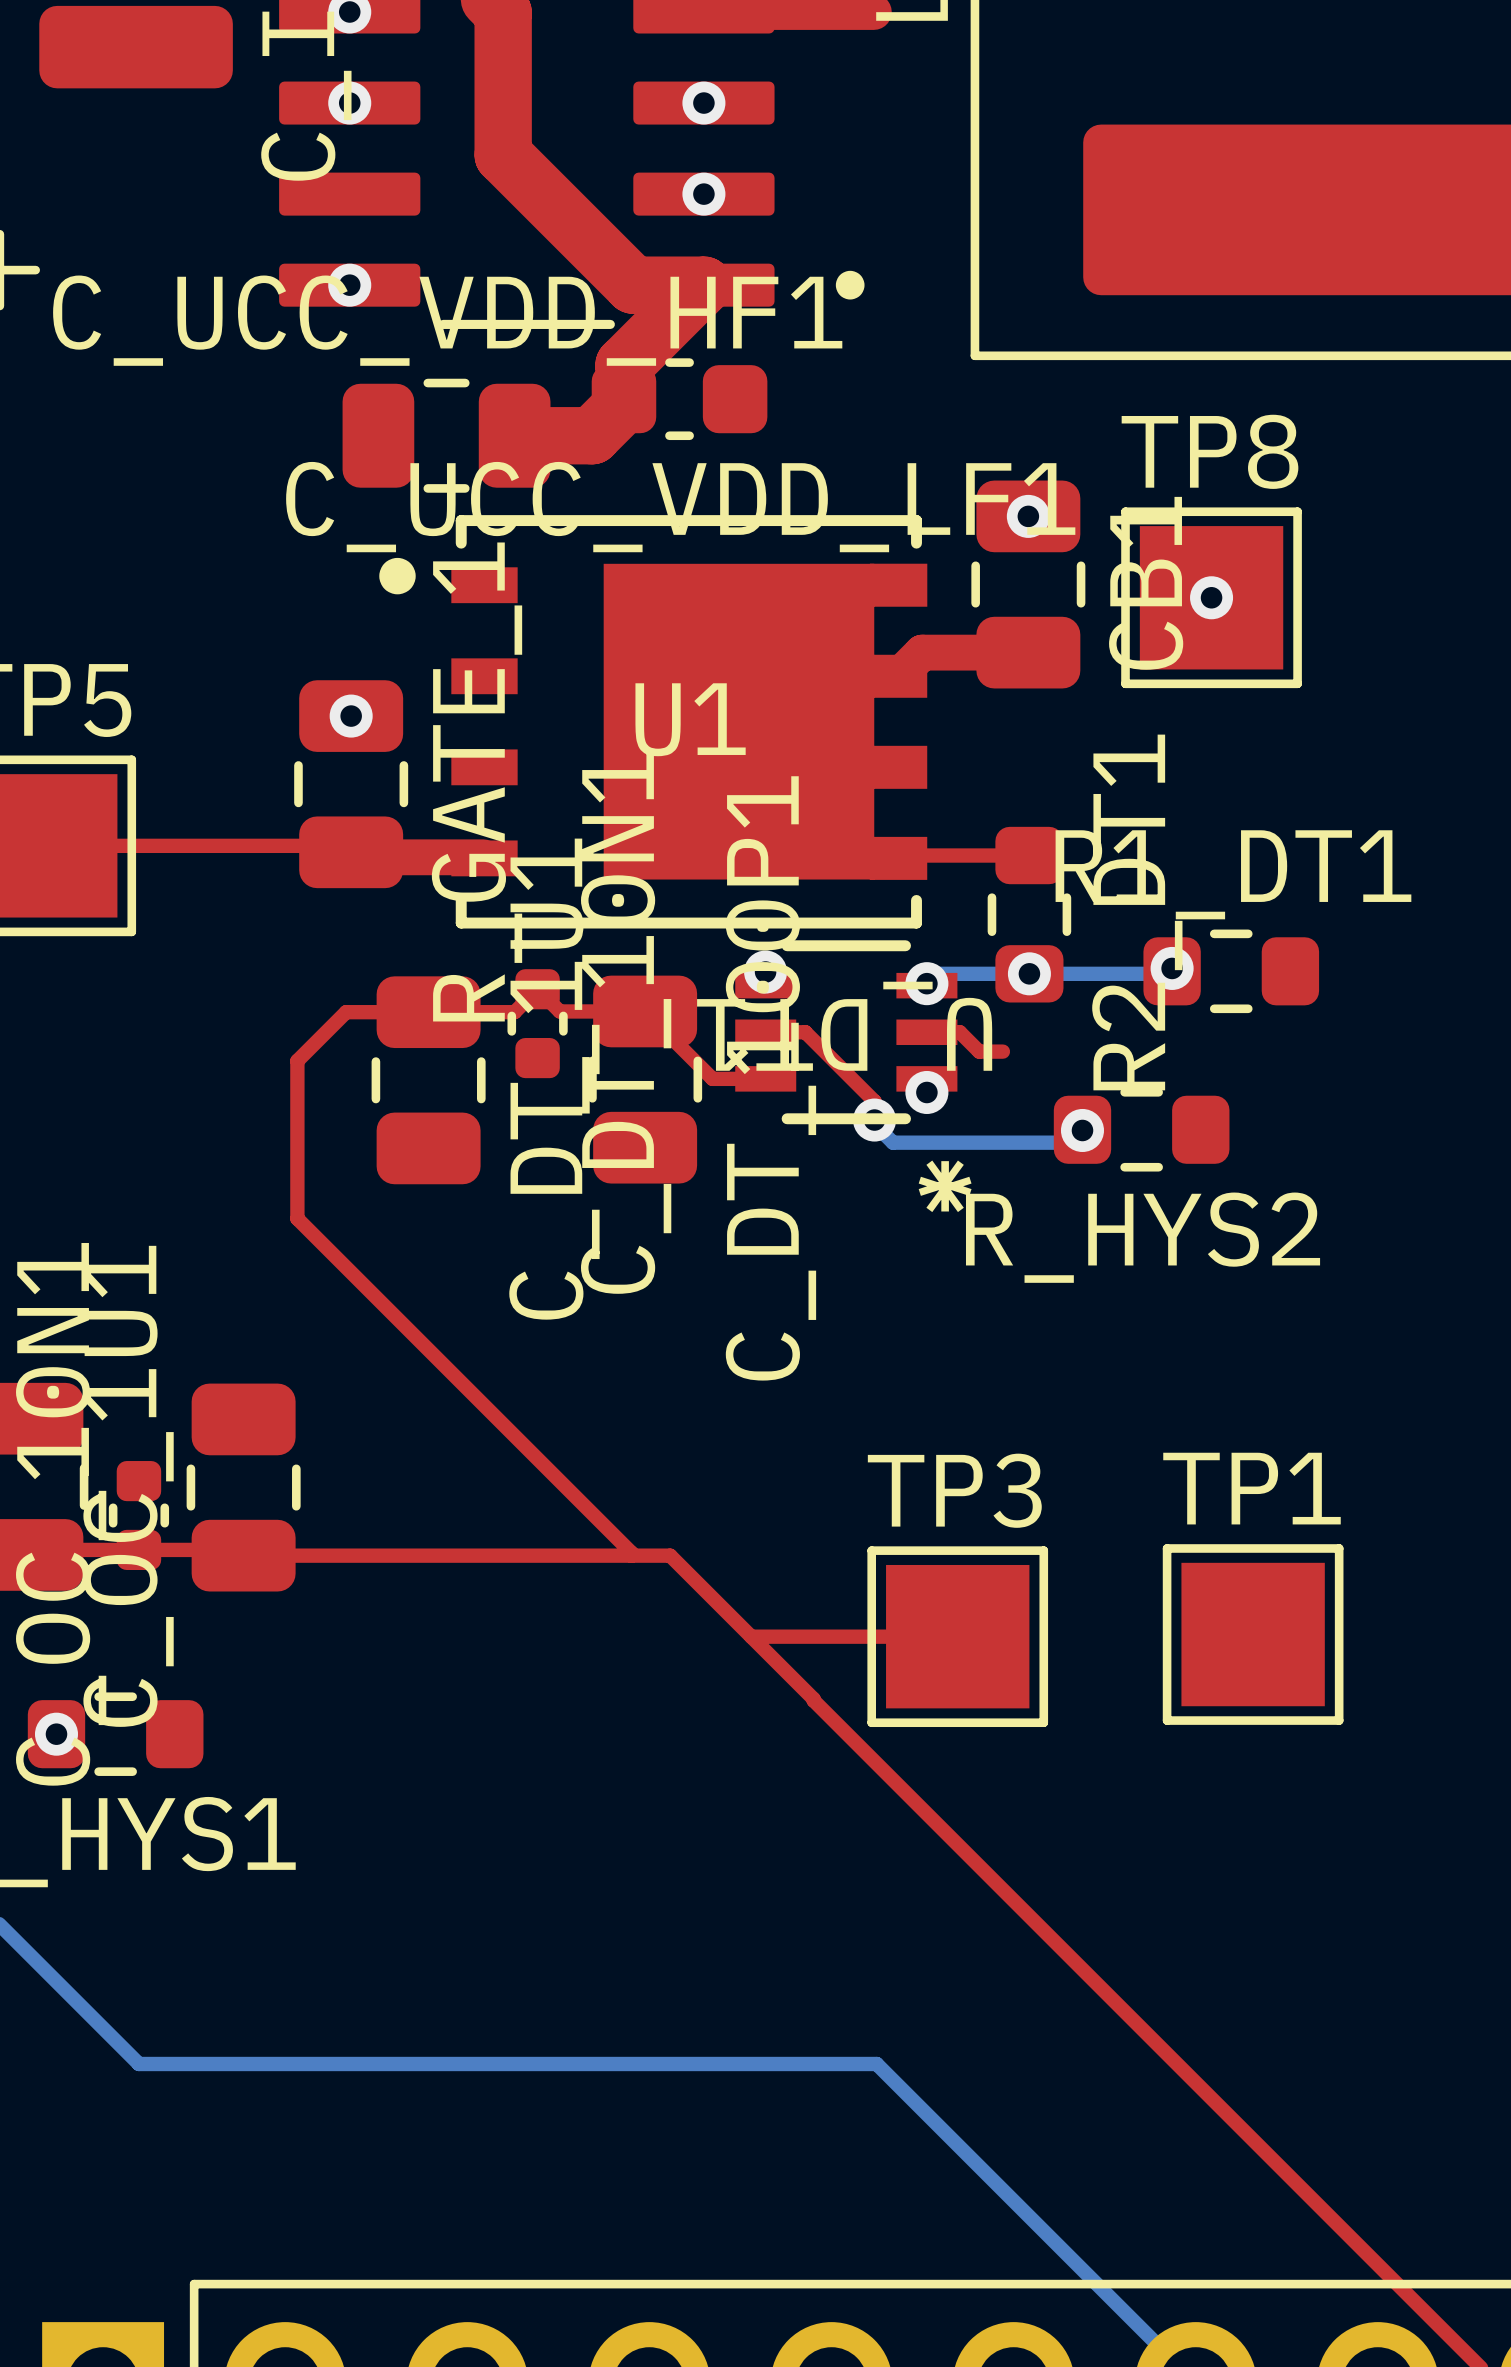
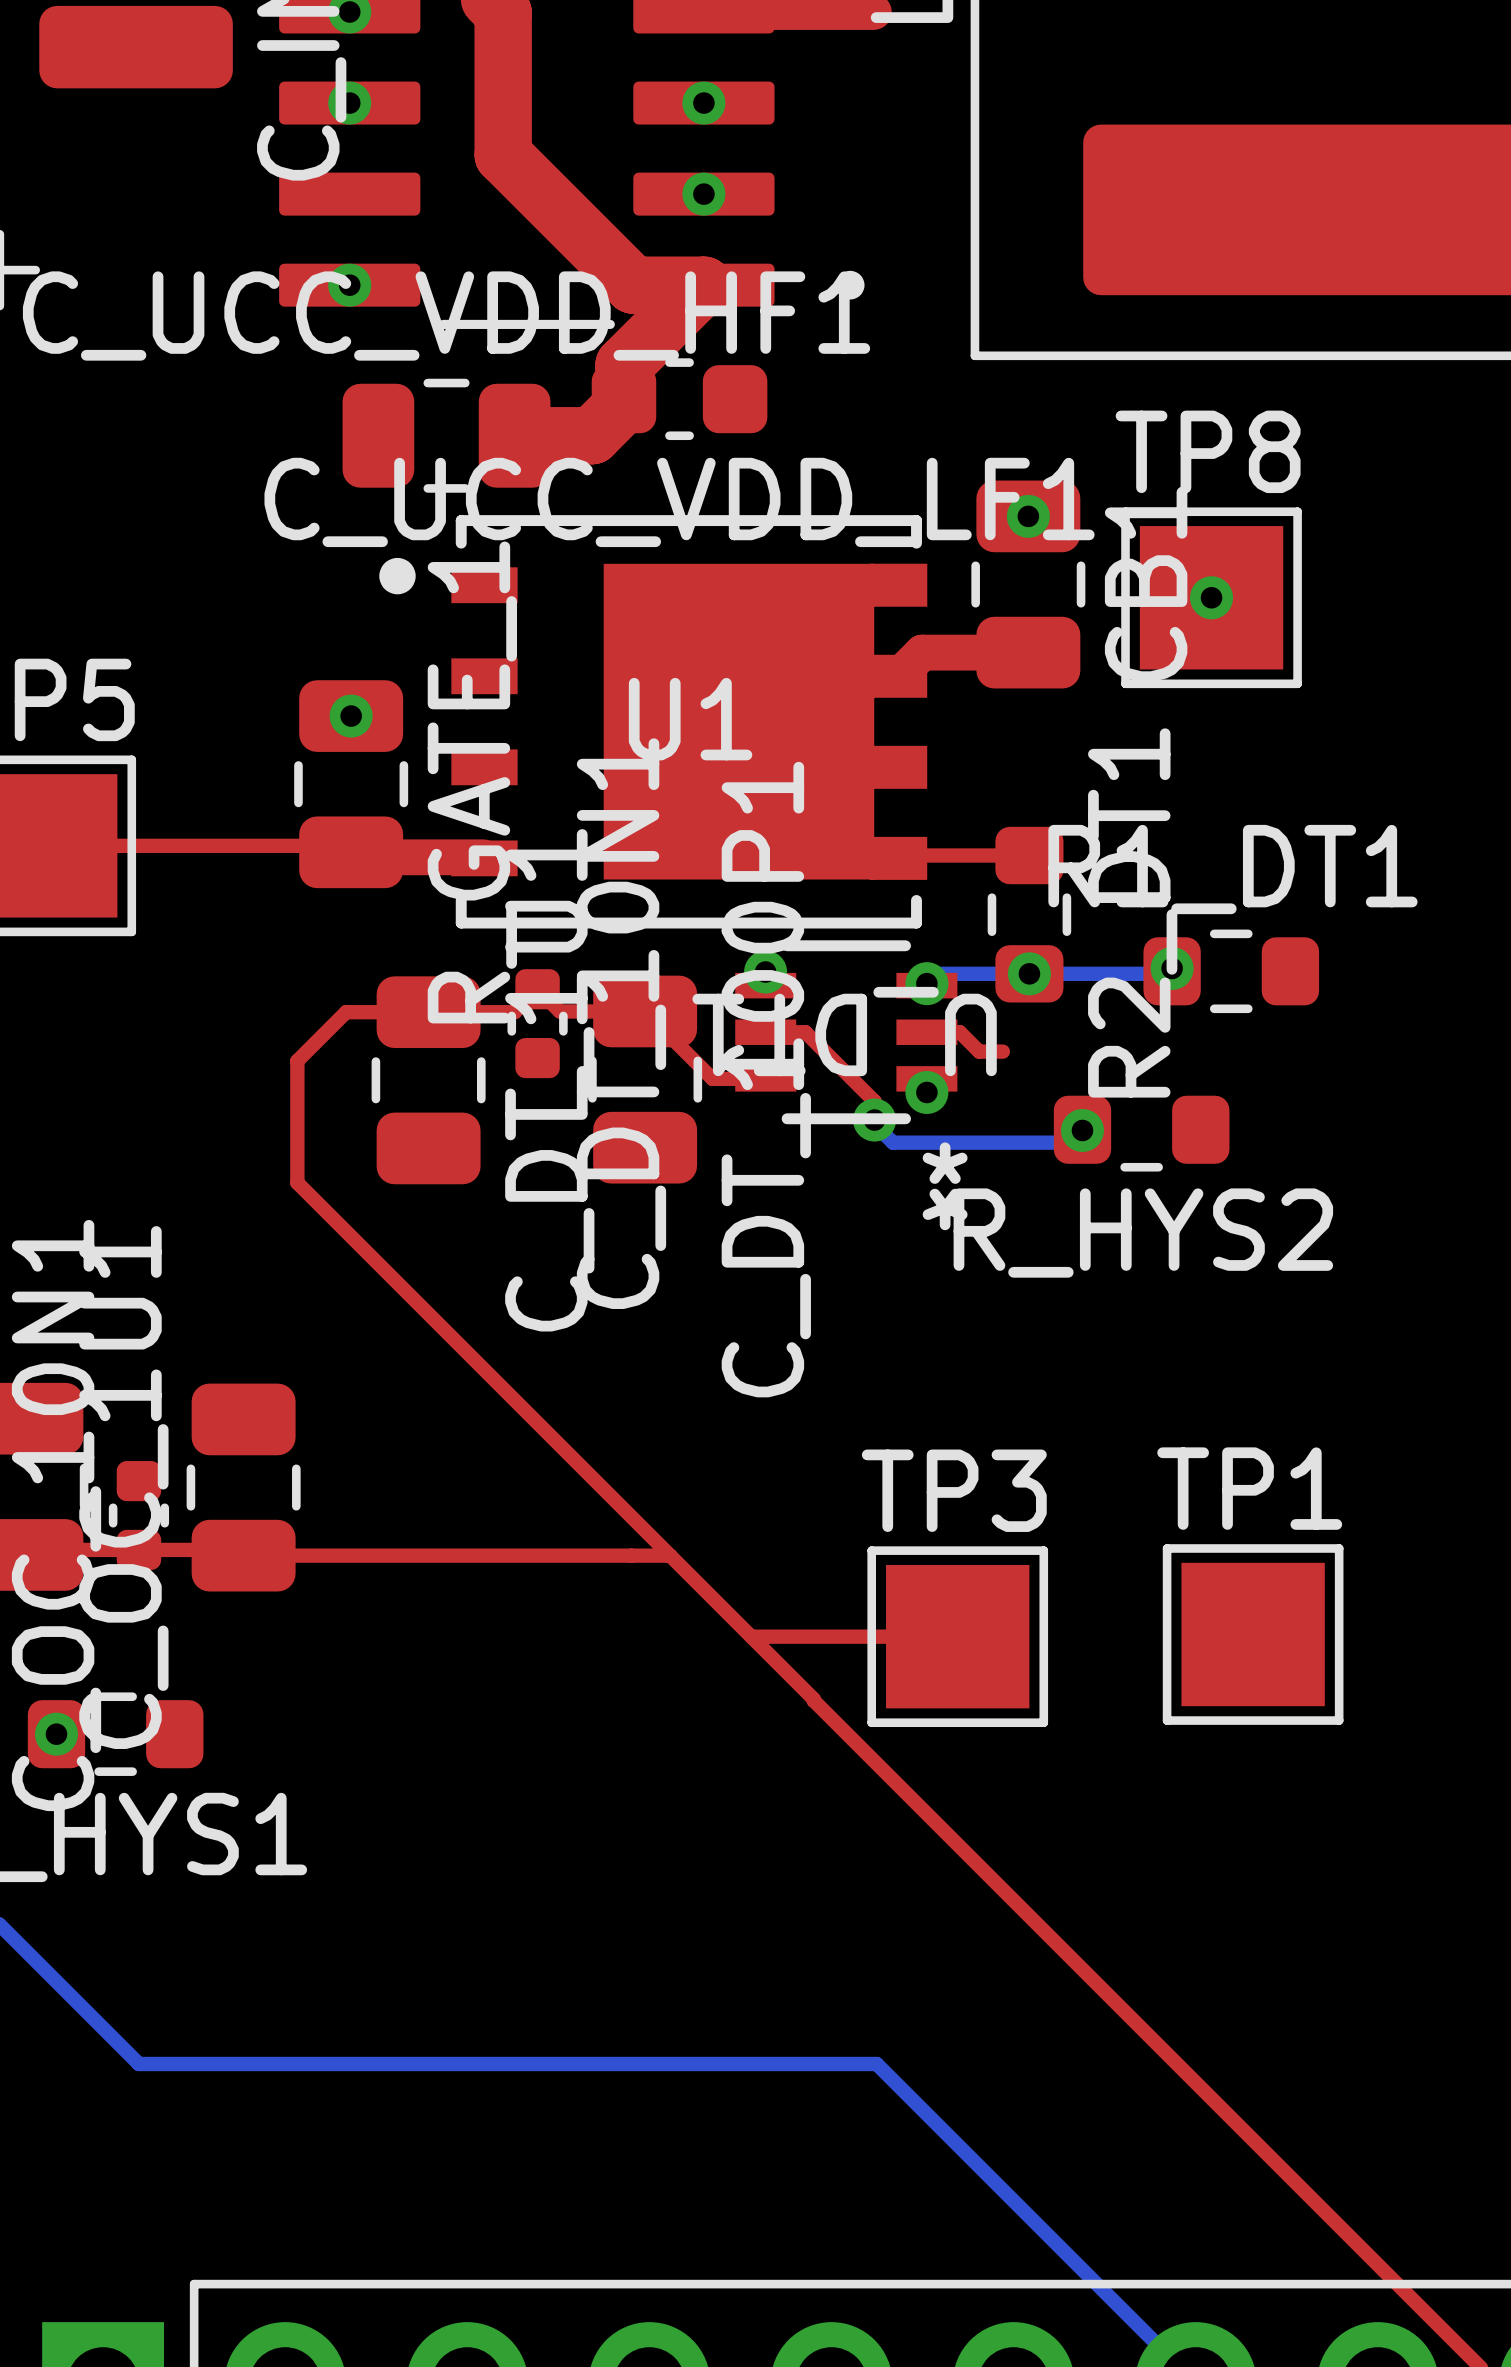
top track: (297, 1182) (297, 1218) (631, 1552) (631, 1555) -> (297, 1182) (670, 1555)

